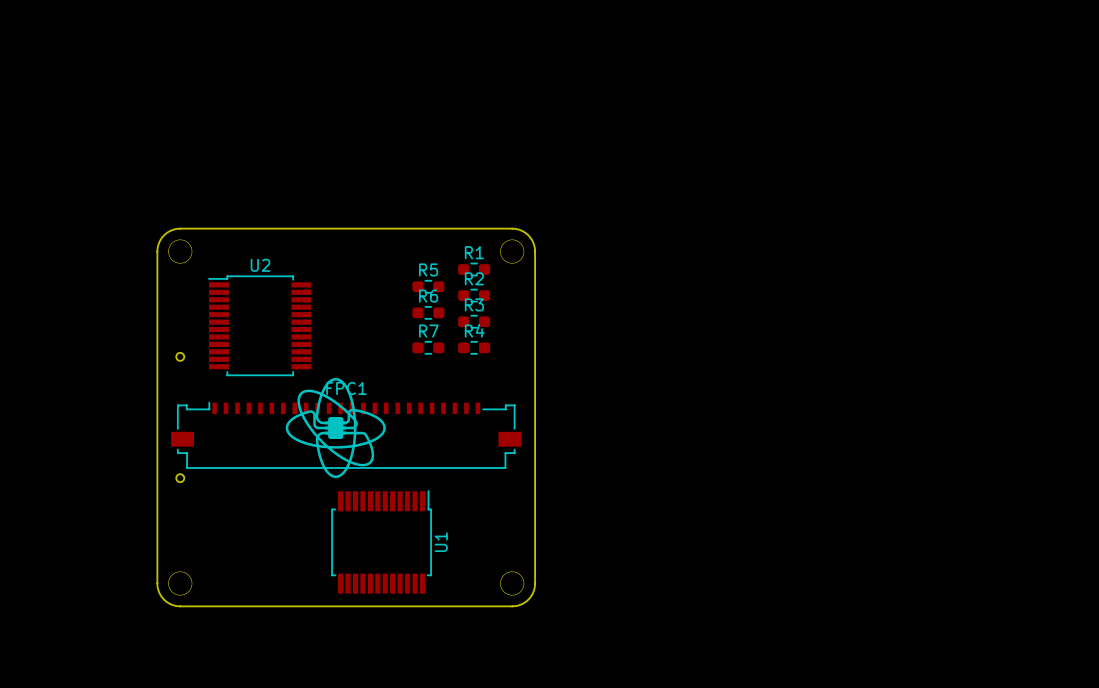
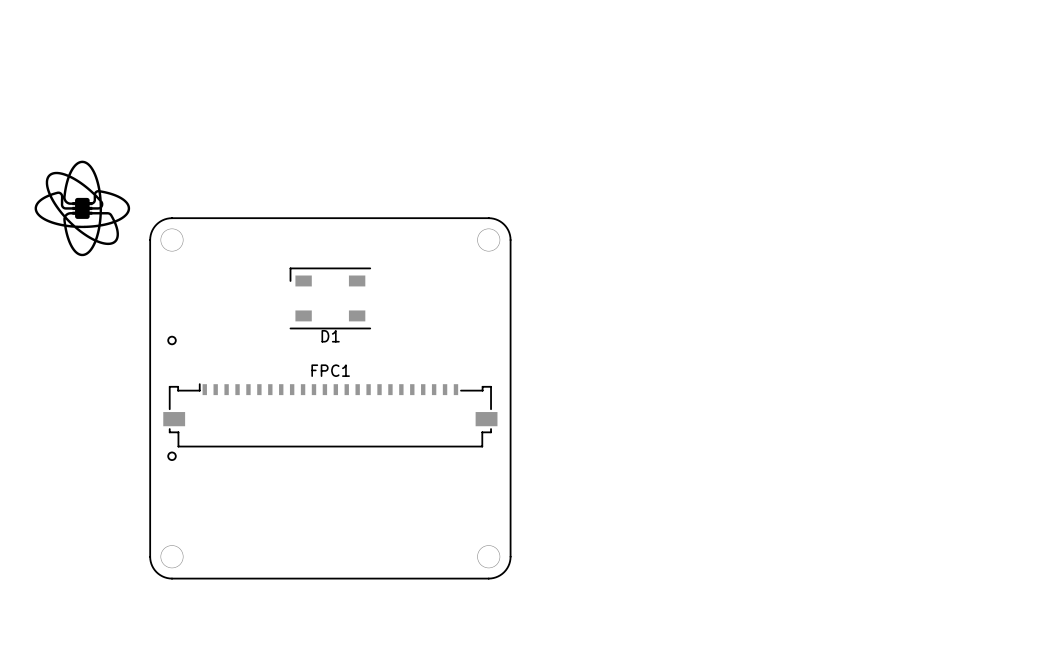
drawing: none -> [34, 160, 131, 257]
R1: (474, 269) -> none
R5: (428, 286) -> none
R2: (474, 295) -> none
D1: none -> (330, 298)
R6: (428, 312) -> none
R3: (474, 321) -> none
U2: (259, 325) -> none
R7: (428, 347) -> none
R4: (474, 347) -> none
drawing: [285, 377, 386, 479] -> none
U1: (381, 542) -> none

